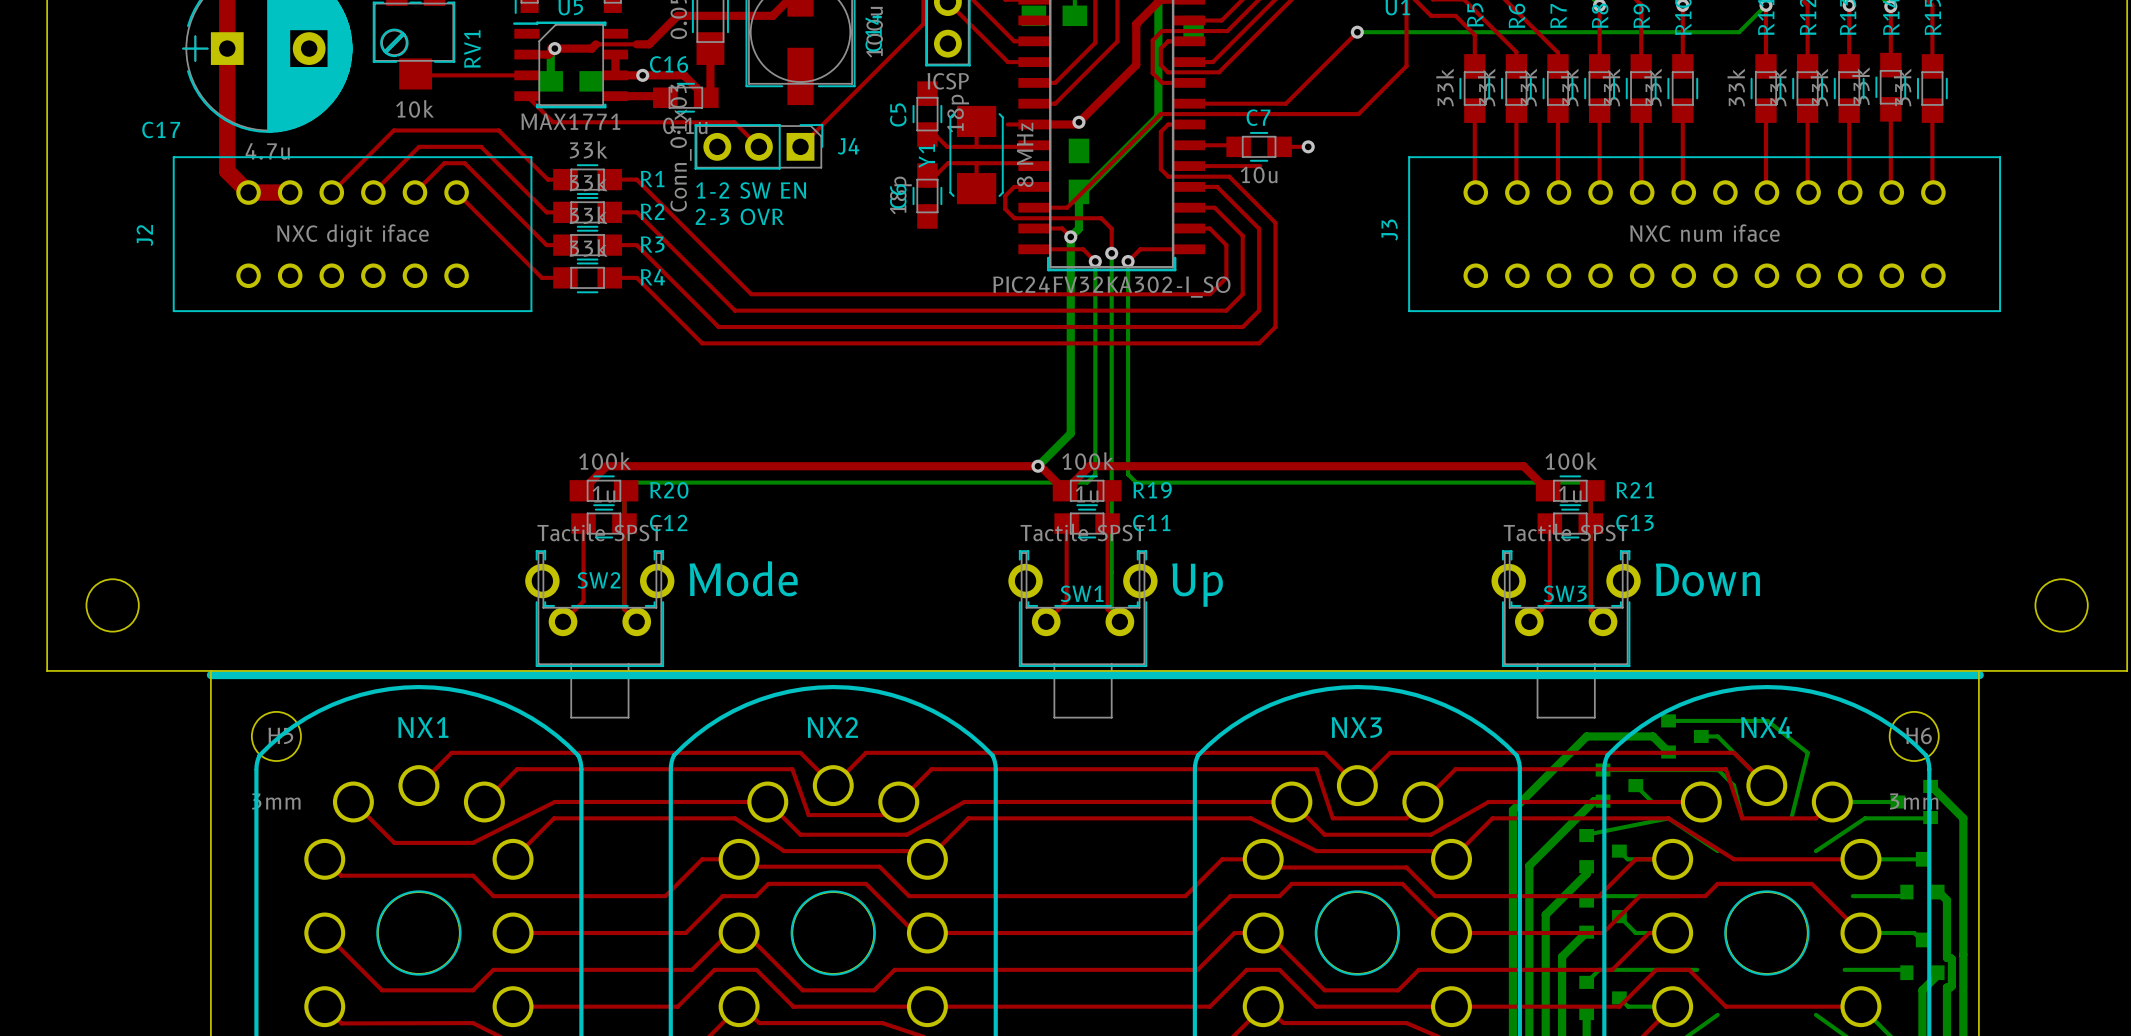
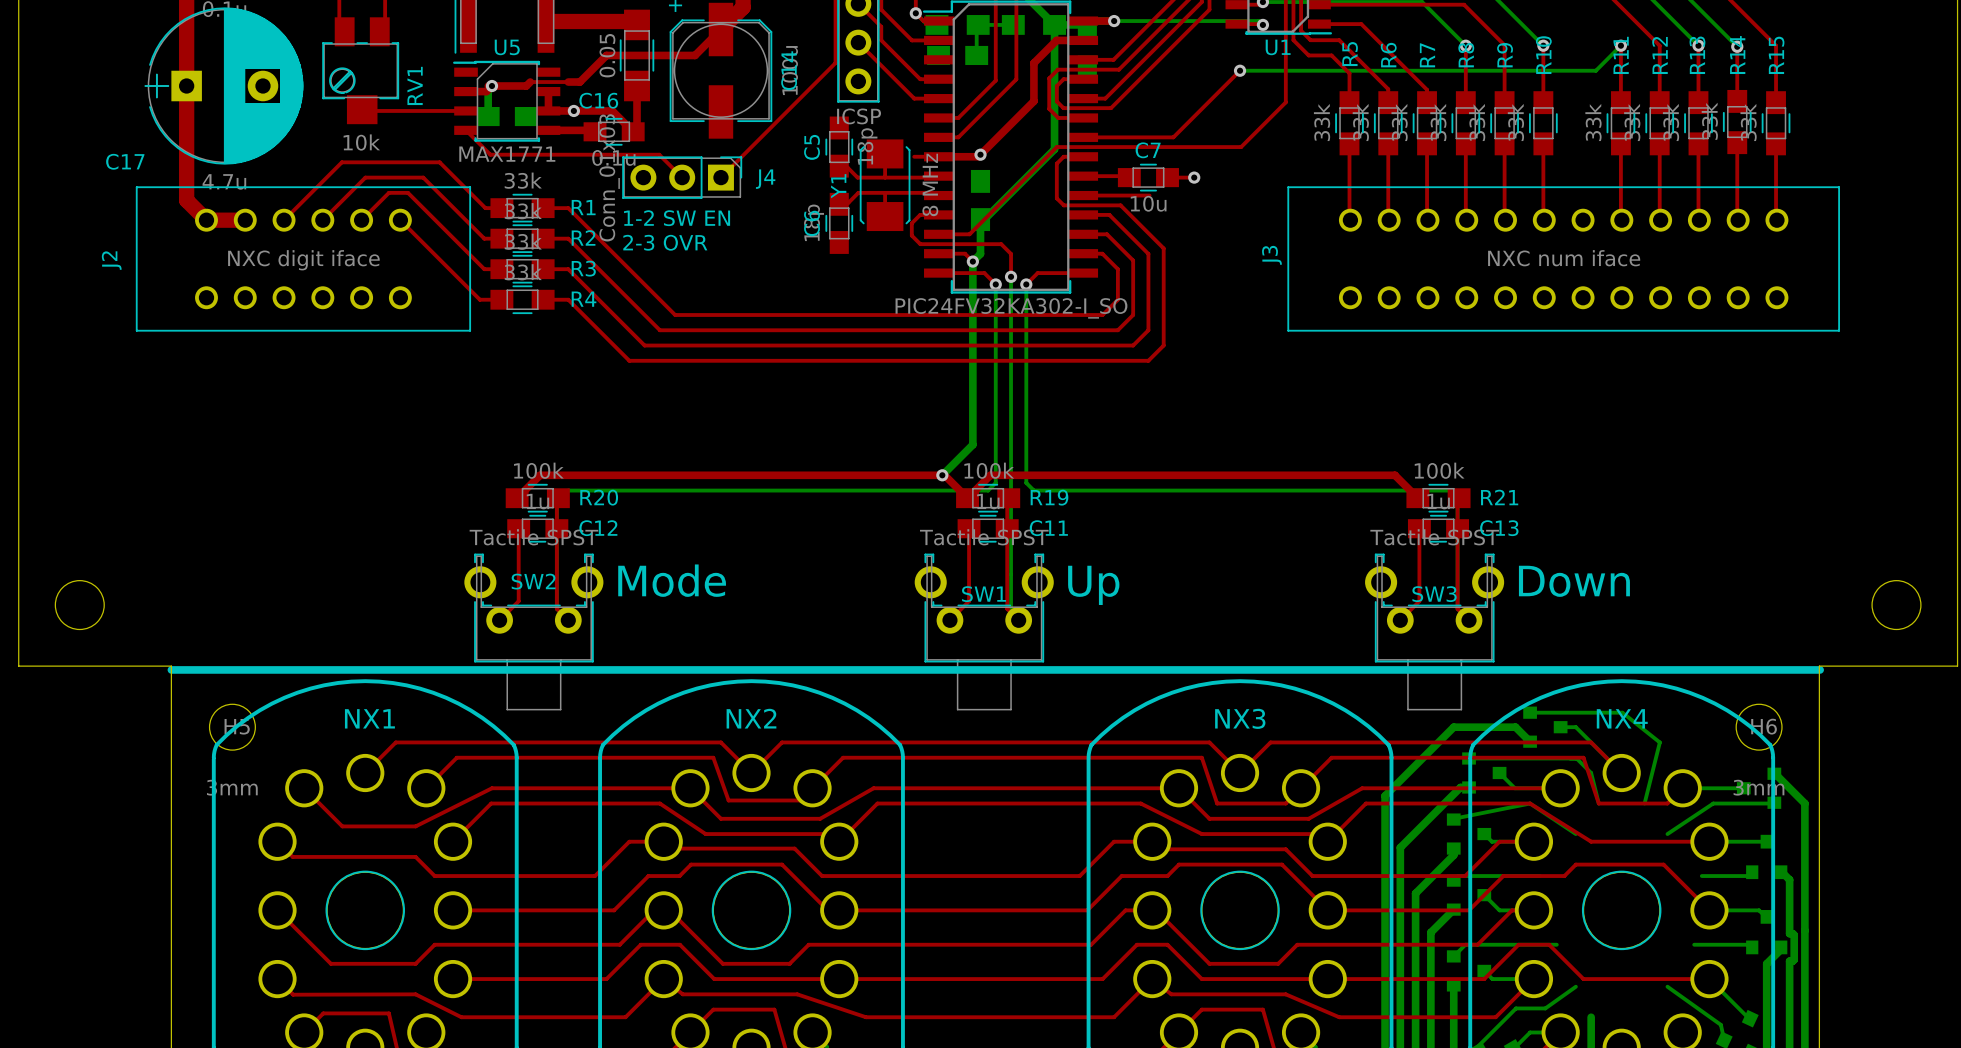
board edge: (210, 670) (1978, 670) -> none

